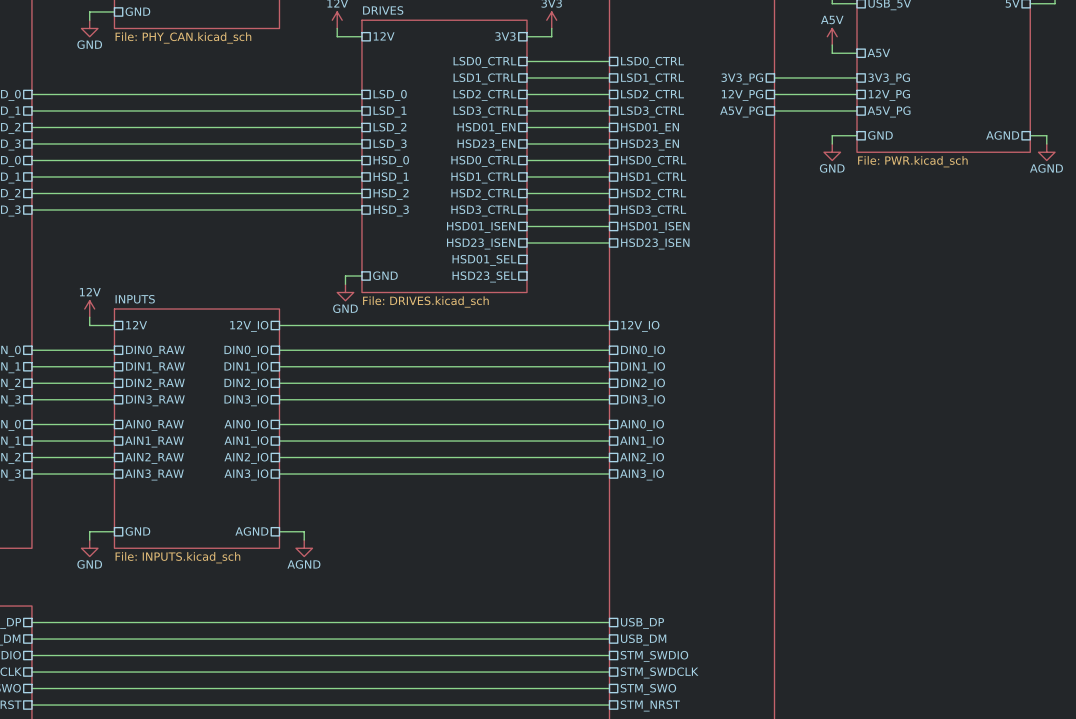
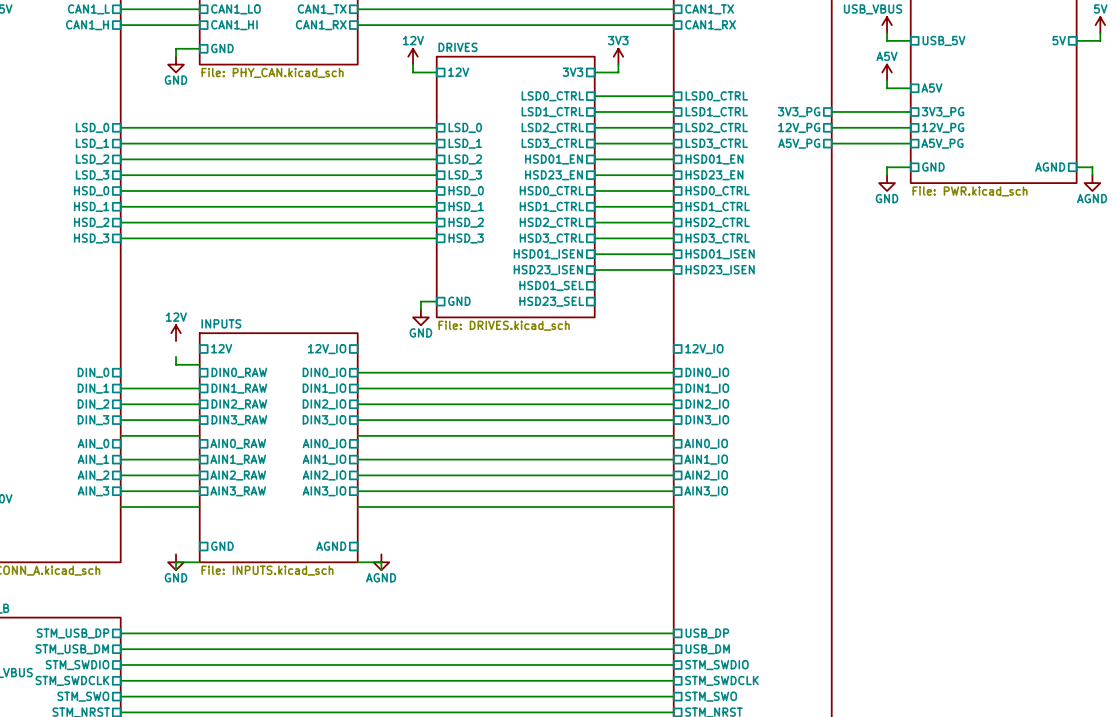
wire: (89, 317) (89, 325) (114, 325) -> (176, 356) (176, 364) (199, 364)
wire: (279, 325) (609, 325) -> (357, 435) (673, 435)
wire: (31, 350) (114, 350) -> (120, 435) (199, 435)
wire: (31, 424) (114, 424) -> (120, 507) (199, 507)
wire: (279, 424) (609, 424) -> (357, 507) (673, 507)
wire: (114, 531) (89, 531) (89, 540) -> (199, 562) (176, 562) (176, 570)
wire: (279, 531) (304, 531) (304, 540) -> (357, 562) (381, 562) (381, 570)

